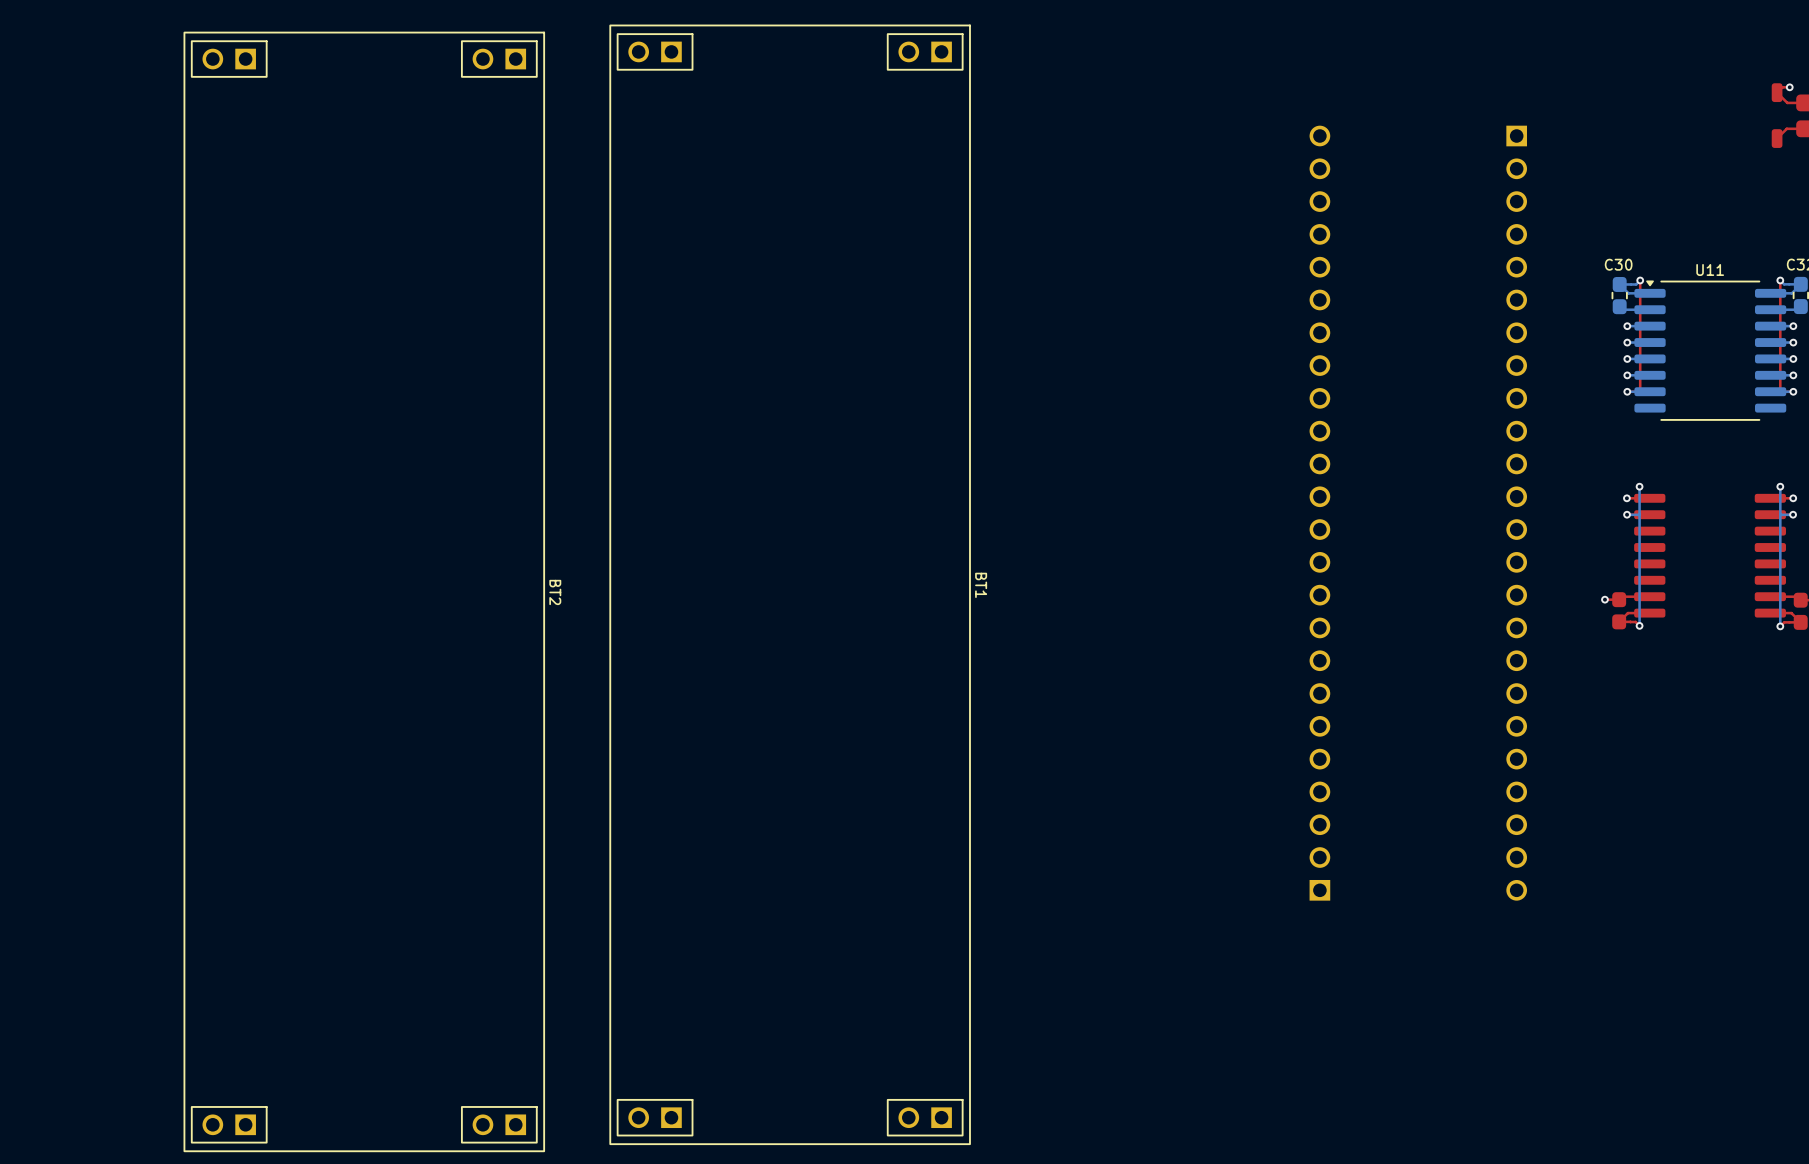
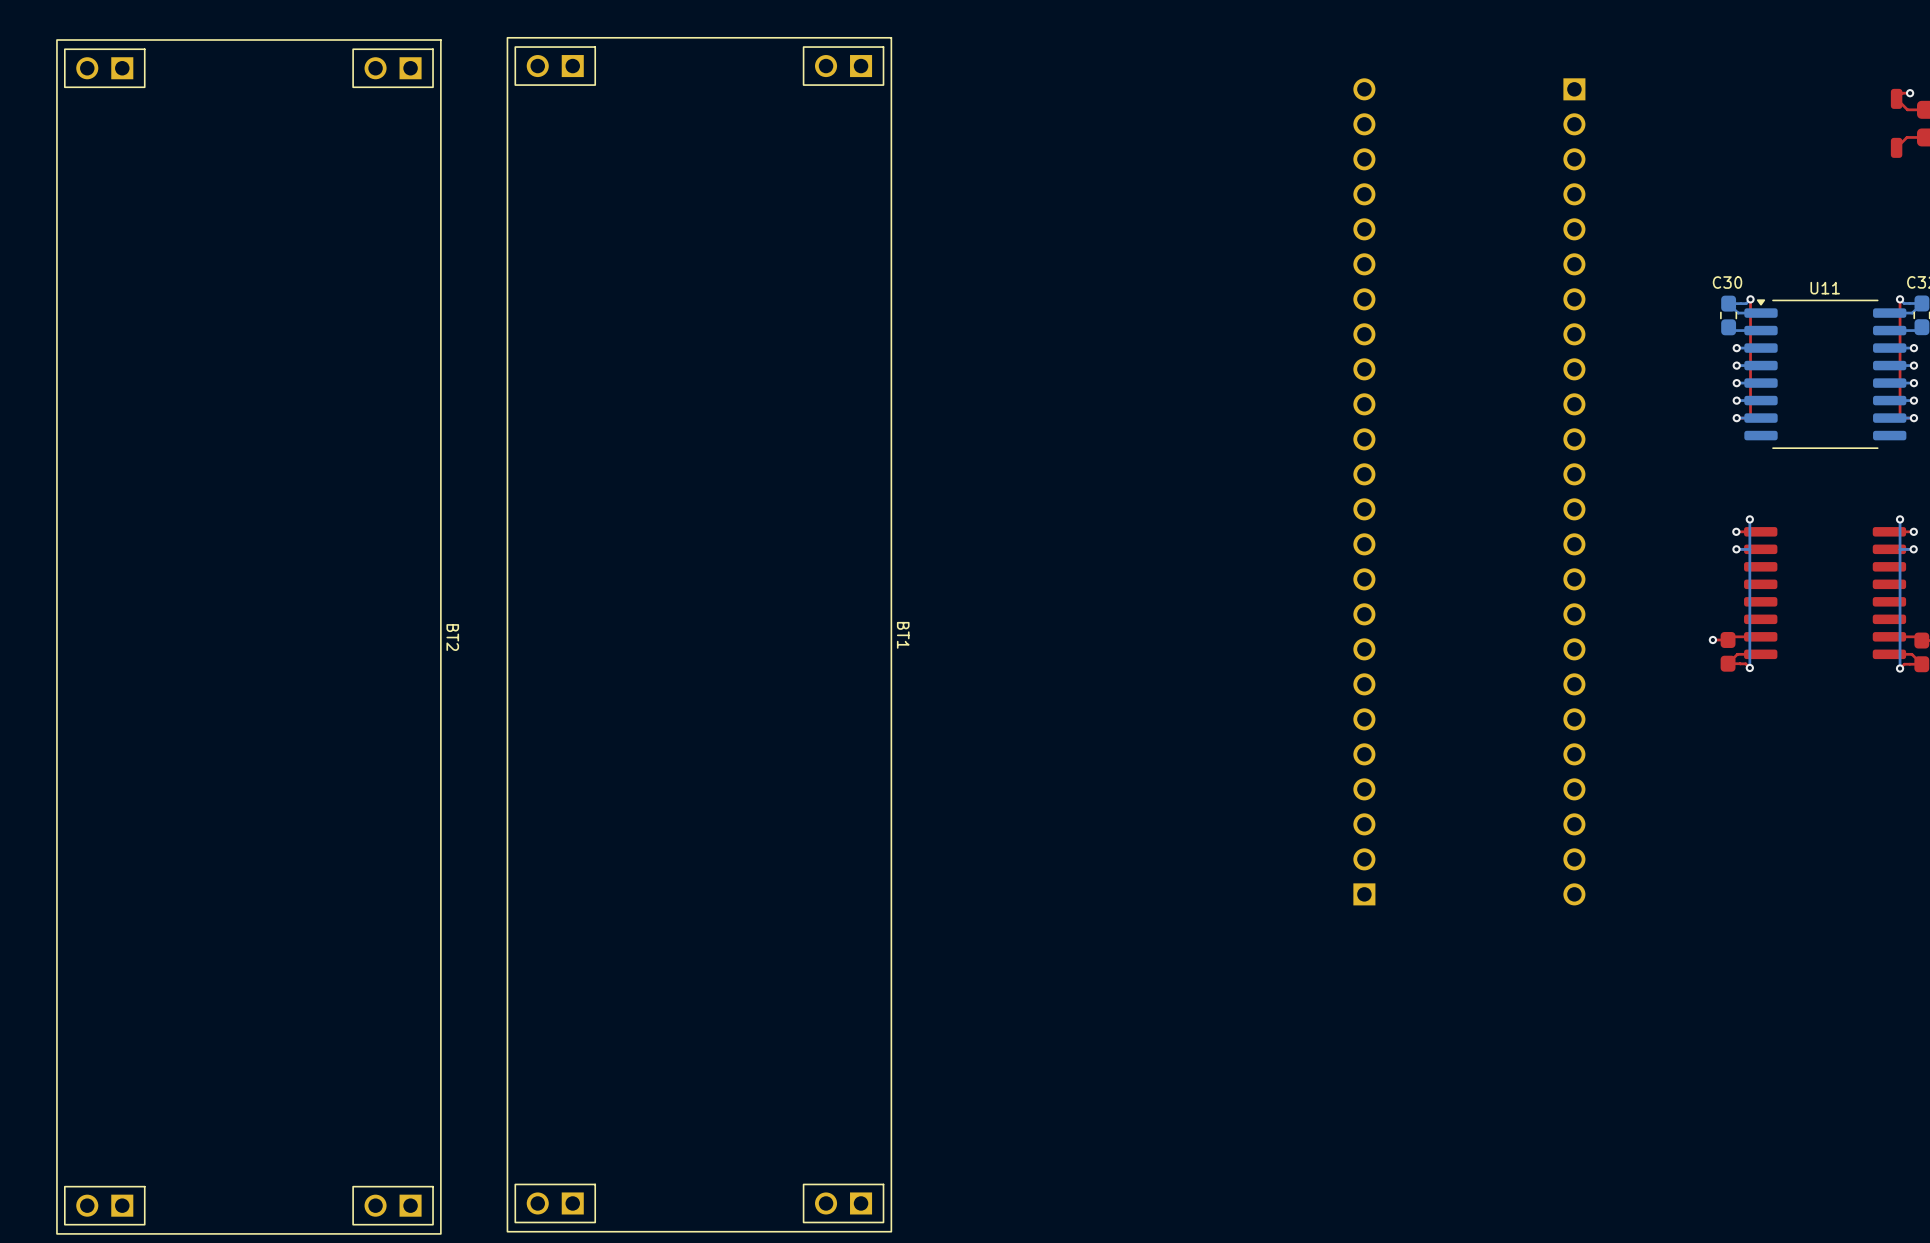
part position: (1319, 513) -> (1364, 491)
part position: (1516, 513) -> (1574, 491)
BT1 position: (790, 584) -> (699, 634)
BT2 position: (364, 591) -> (248, 636)

